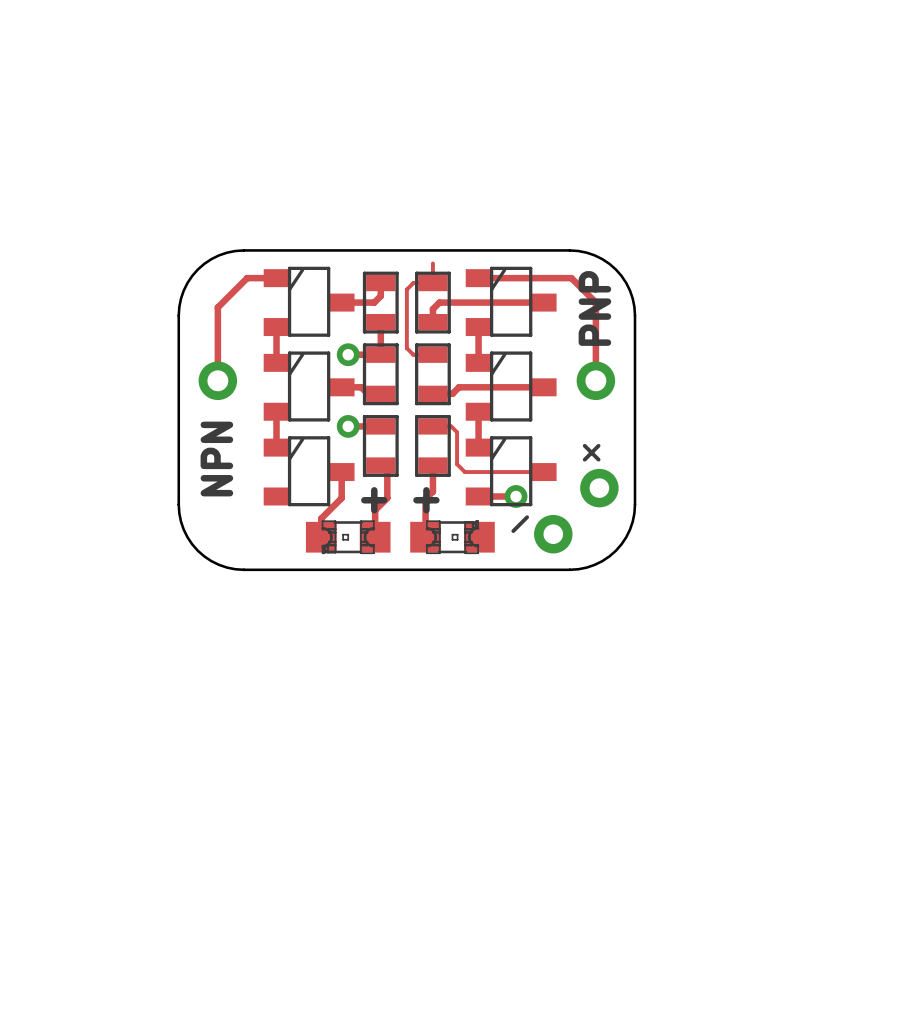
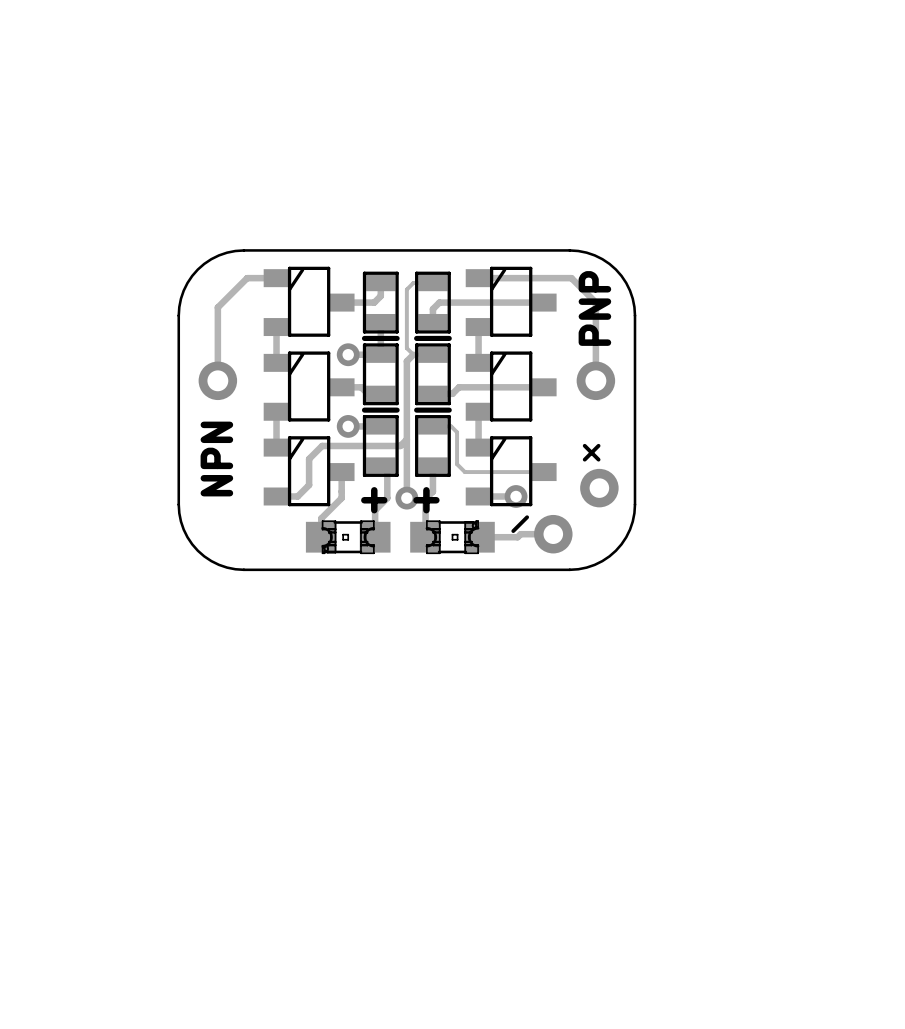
track: (432, 263) (432, 283) -> none
line: none -> (364, 338) (397, 338)
line: none -> (416, 338) (449, 338)
track: none -> (413, 354) (406, 361) (406, 498)
line: none -> (364, 410) (397, 410)
line: none -> (416, 410) (449, 410)
track: none -> (406, 439) (400, 445) (322, 445) (309, 459) (309, 485) (297, 496) (276, 496)
via: none -> (406, 498)
track: none -> (553, 534) (520, 534) (517, 537) (479, 537)

